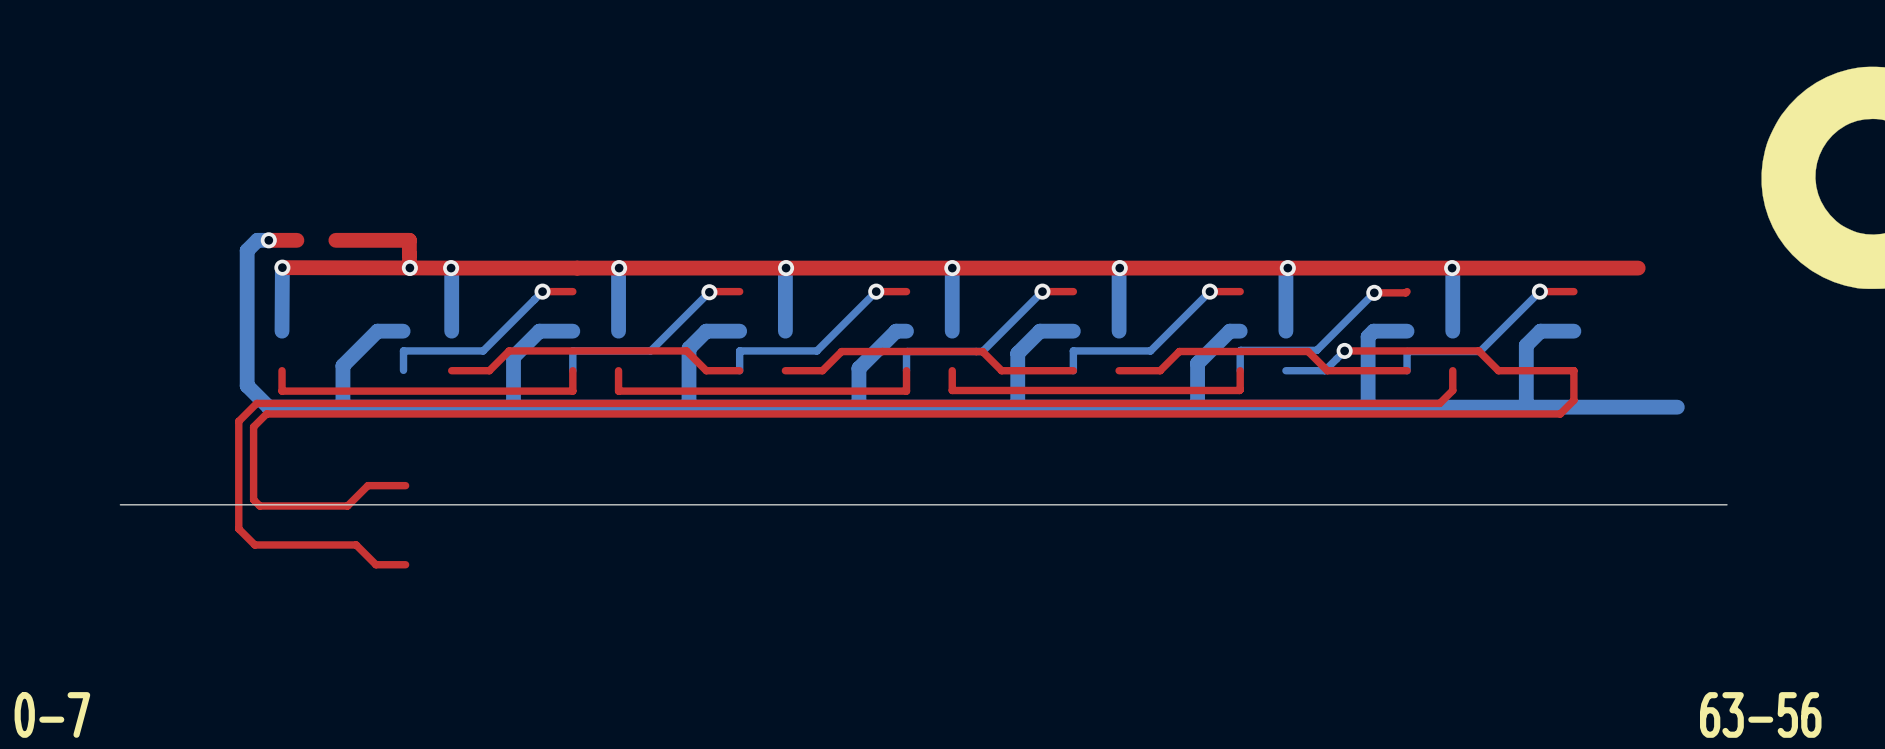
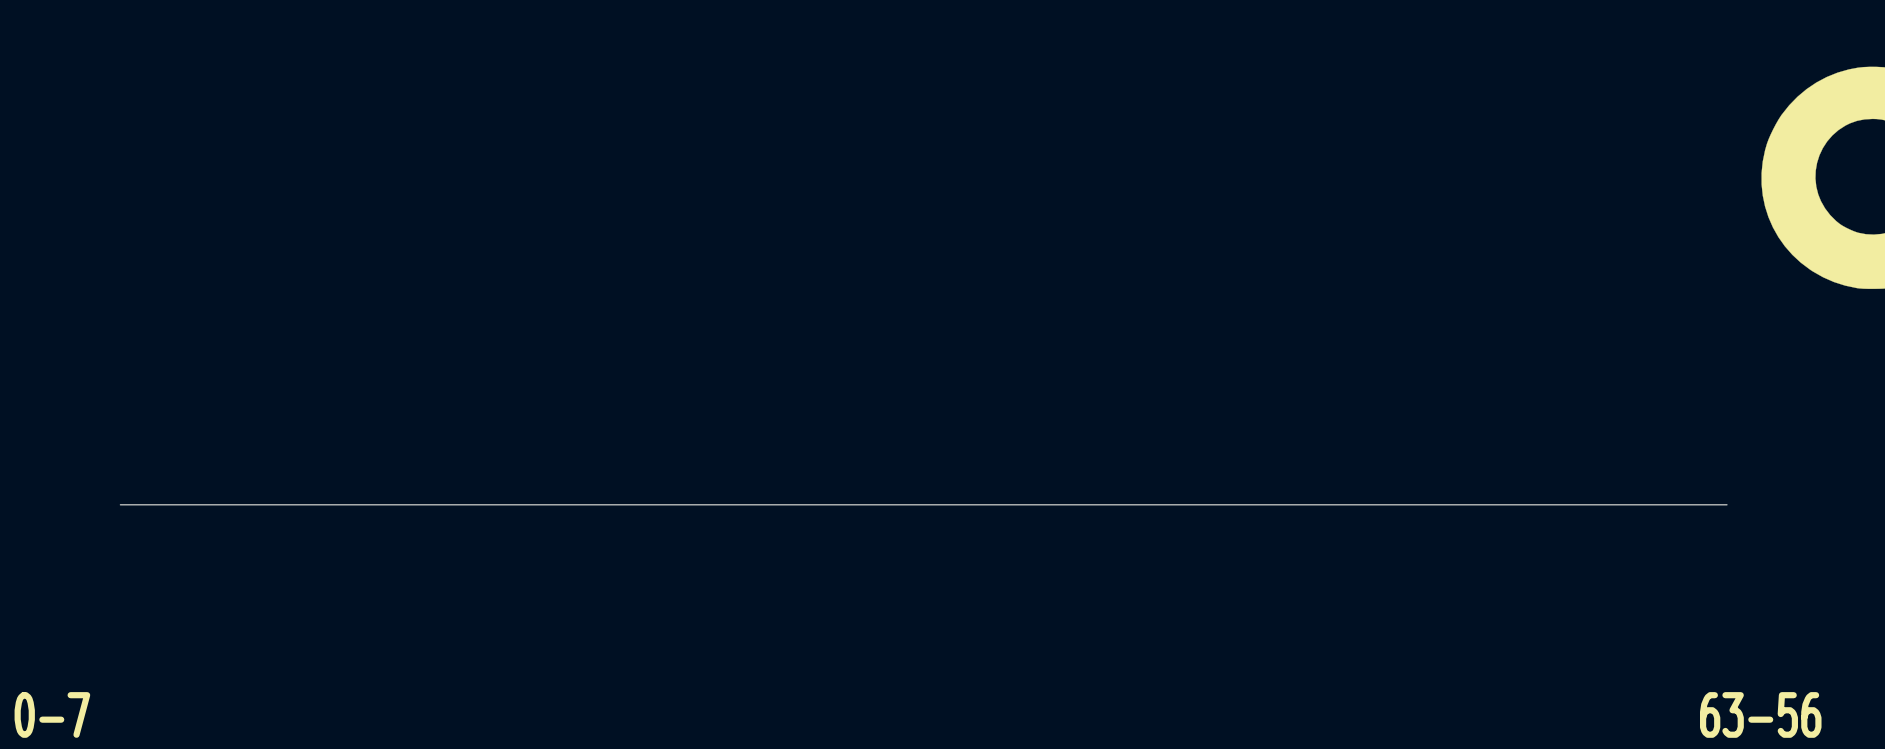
top track: (268, 240) (296, 240) -> none
bottom track: (268, 240) (257, 240) (247, 250) (247, 385) (268, 407) (1677, 407) -> none
via: (268, 240) -> none
top track: (335, 240) (409, 240) (409, 254) -> none
top track: (409, 254) (409, 267) (1638, 268) -> none
top track: (282, 267) (409, 267) -> none
bottom track: (282, 267) (282, 331) -> none
via: (282, 267) -> none
via: (409, 267) -> none
bottom track: (451, 268) (451, 331) -> none
via: (451, 268) -> none
bottom track: (618, 268) (618, 331) -> none
via: (619, 268) -> none
bottom track: (786, 268) (785, 331) -> none
via: (786, 268) -> none
bottom track: (952, 268) (952, 331) -> none
via: (952, 268) -> none
bottom track: (1119, 268) (1119, 331) -> none
via: (1119, 268) -> none
bottom track: (1287, 268) (1285, 269) (1285, 331) -> none
via: (1287, 268) -> none
bottom track: (1452, 268) (1452, 331) -> none
via: (1452, 268) -> none
top track: (542, 291) (572, 291) -> none
bottom track: (542, 291) (483, 350) (403, 350) (403, 370) -> none
via: (542, 291) -> none
top track: (739, 291) (709, 292) -> none
top track: (876, 291) (906, 291) -> none
bottom track: (876, 291) (816, 350) (739, 350) (739, 370) -> none
via: (876, 291) -> none
top track: (1042, 291) (1073, 291) -> none
bottom track: (1042, 291) (982, 351) (907, 351) (906, 370) -> none
via: (1042, 291) -> none
top track: (1209, 291) (1240, 291) -> none
bottom track: (1209, 291) (1150, 350) (1073, 350) (1073, 370) -> none
via: (1209, 291) -> none
top track: (1407, 291) (1374, 292) -> none
top track: (1539, 291) (1573, 291) -> none
bottom track: (1539, 291) (1480, 351) (1407, 351) -> none
via: (1539, 291) -> none
bottom track: (709, 292) (650, 350) (572, 350) (572, 370) -> none
via: (709, 292) -> none
bottom track: (1374, 292) (1316, 350) (1240, 350) (1240, 370) -> none
via: (1374, 292) -> none
bottom track: (403, 331) (377, 331) (342, 365) (342, 407) -> none
bottom track: (572, 331) (539, 331) (513, 357) (513, 407) -> none
bottom track: (739, 331) (706, 331) (689, 348) (689, 407) -> none
bottom track: (906, 331) (896, 331) (858, 368) (858, 407) -> none
bottom track: (1073, 331) (1039, 331) (1017, 353) (1017, 407) -> none
bottom track: (1240, 331) (1229, 331) (1197, 363) (1197, 407) -> none
bottom track: (1407, 331) (1373, 331) (1368, 336) (1368, 407) -> none
bottom track: (1573, 331) (1540, 331) (1526, 345) (1526, 407) -> none
top track: (1344, 350) (1478, 350) (1498, 370) (1573, 370) (1573, 400) (1560, 413) (266, 413) -> none
bottom track: (1344, 350) (1324, 370) (1285, 370) -> none
via: (1344, 350) -> none
bottom track: (1407, 351) (1407, 370) -> none
top track: (282, 370) (282, 391) (572, 391) (572, 370) -> none
top track: (451, 370) (489, 370) (509, 350) (686, 350) (706, 370) (739, 370) -> none
top track: (618, 370) (618, 391) (906, 391) (906, 370) -> none
top track: (785, 370) (822, 370) (841, 351) (982, 351) (1001, 370) (1073, 370) -> none
top track: (952, 370) (952, 390) (1239, 390) (1240, 370) -> none
top track: (1119, 370) (1160, 370) (1179, 351) (1308, 351) (1327, 370) (1407, 370) -> none
top track: (1452, 370) (1452, 390) (1439, 403) (257, 403) -> none
top track: (256, 403) (238, 421) (238, 528) (254, 544) (356, 544) (375, 564) (405, 564) -> none
top track: (266, 413) (253, 426) (253, 499) (259, 505) (347, 505) (367, 485) (405, 485) -> none

